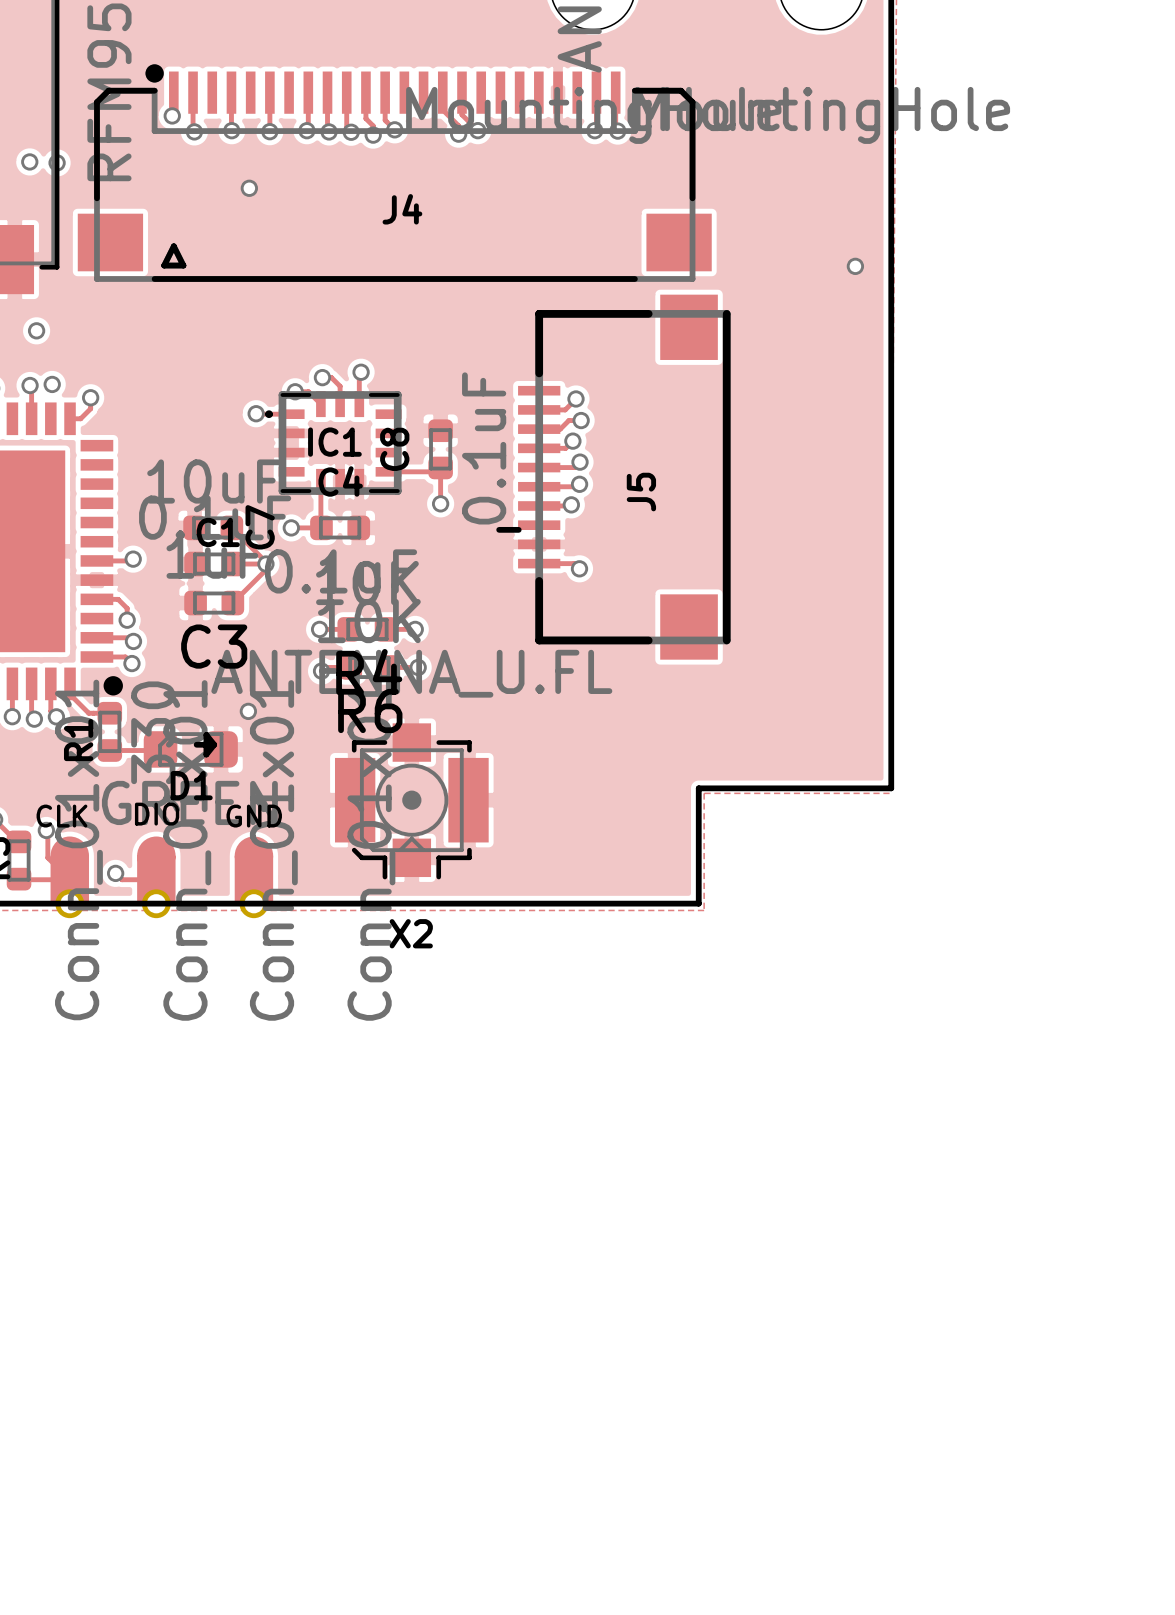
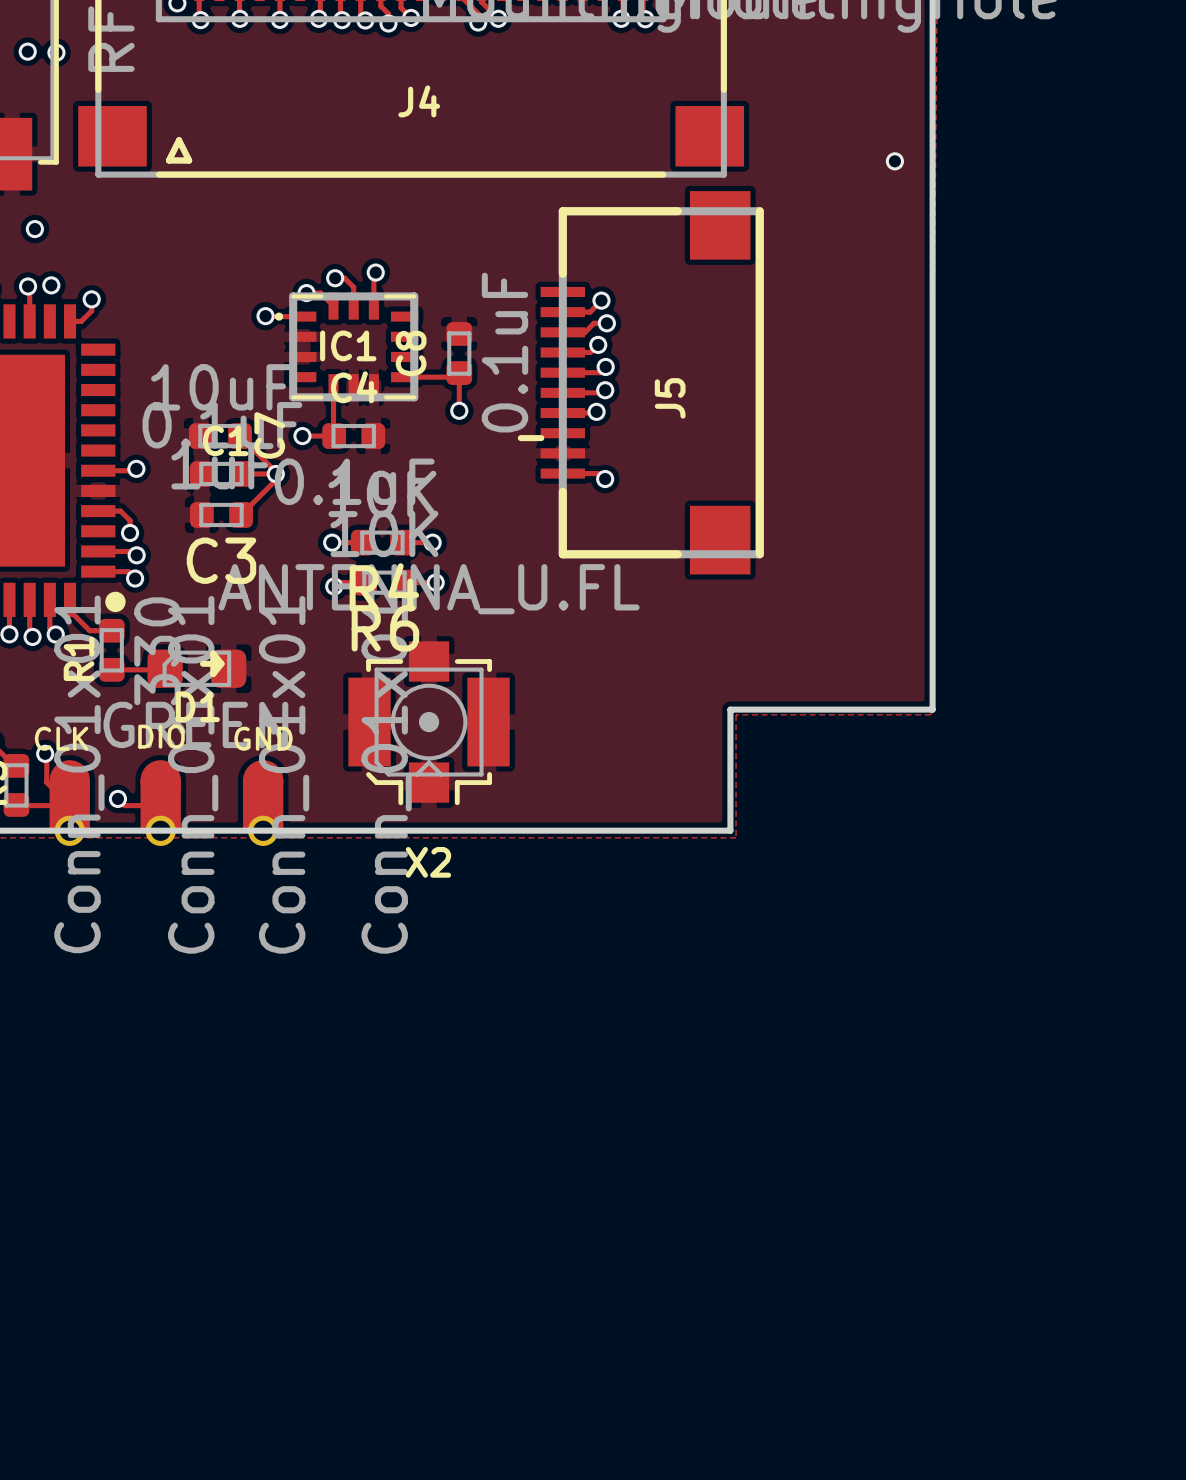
via: (249, 188) -> none
via: (248, 711) -> none

